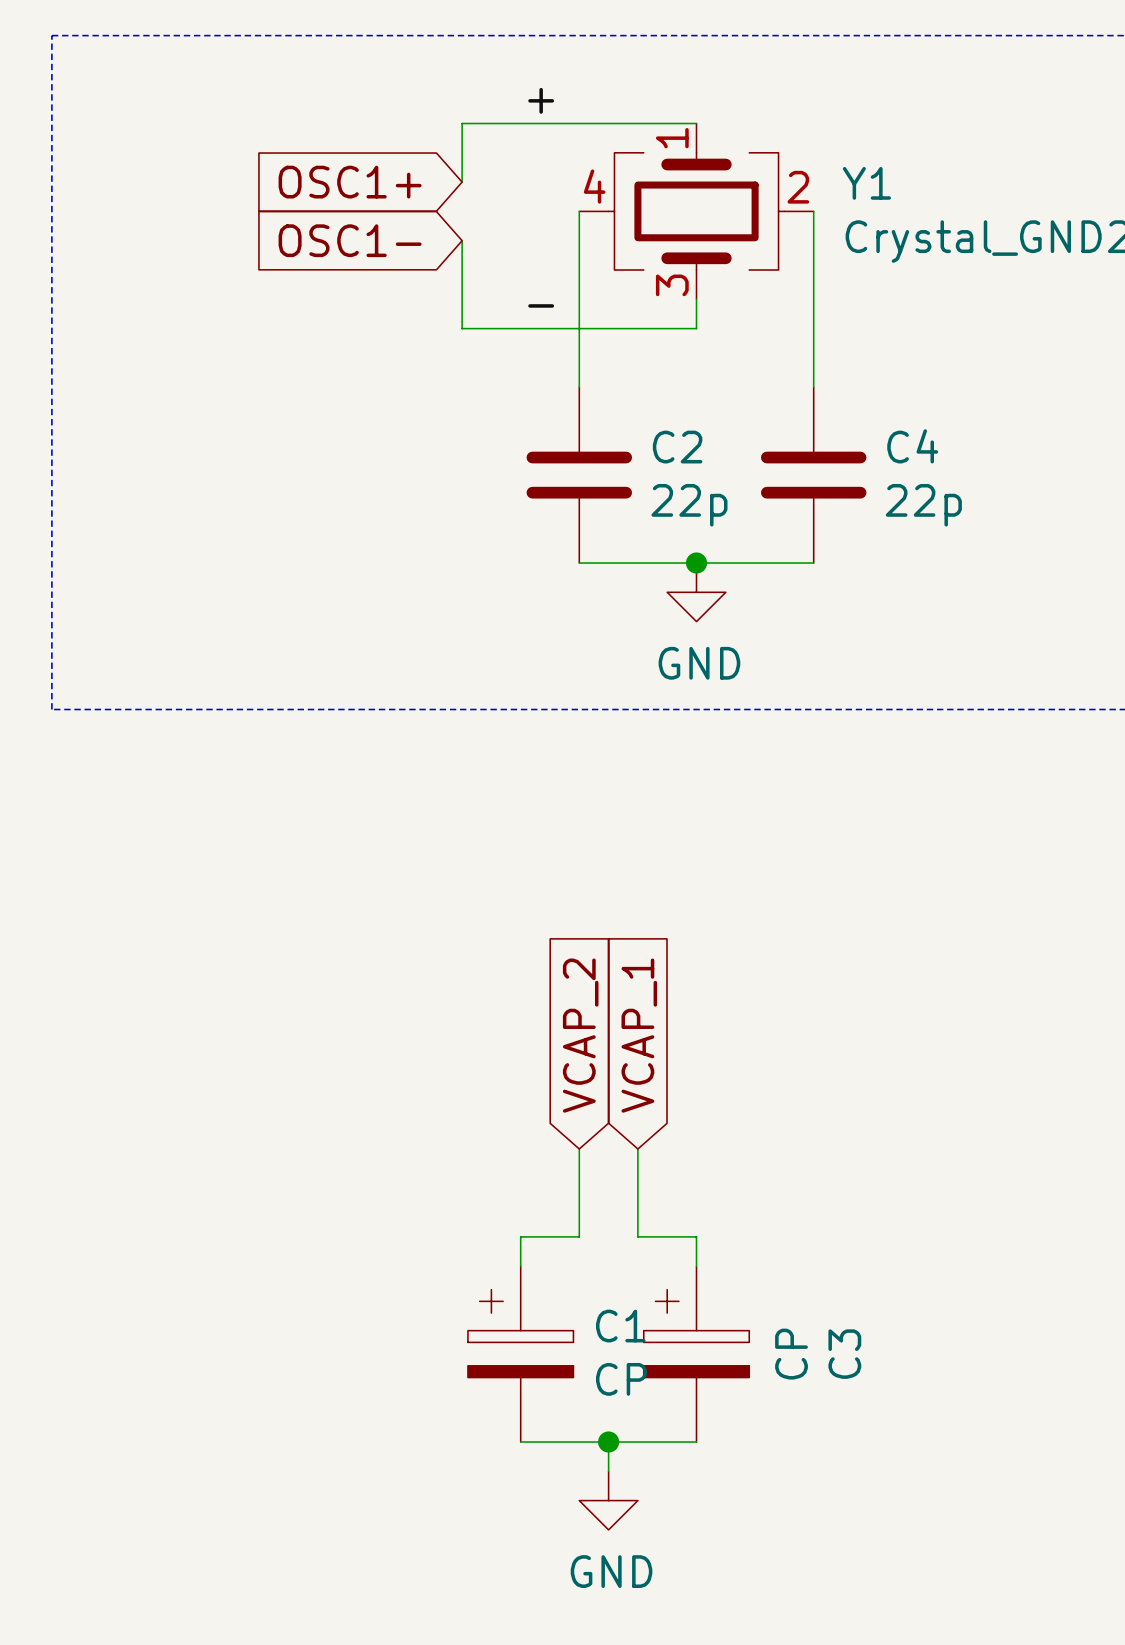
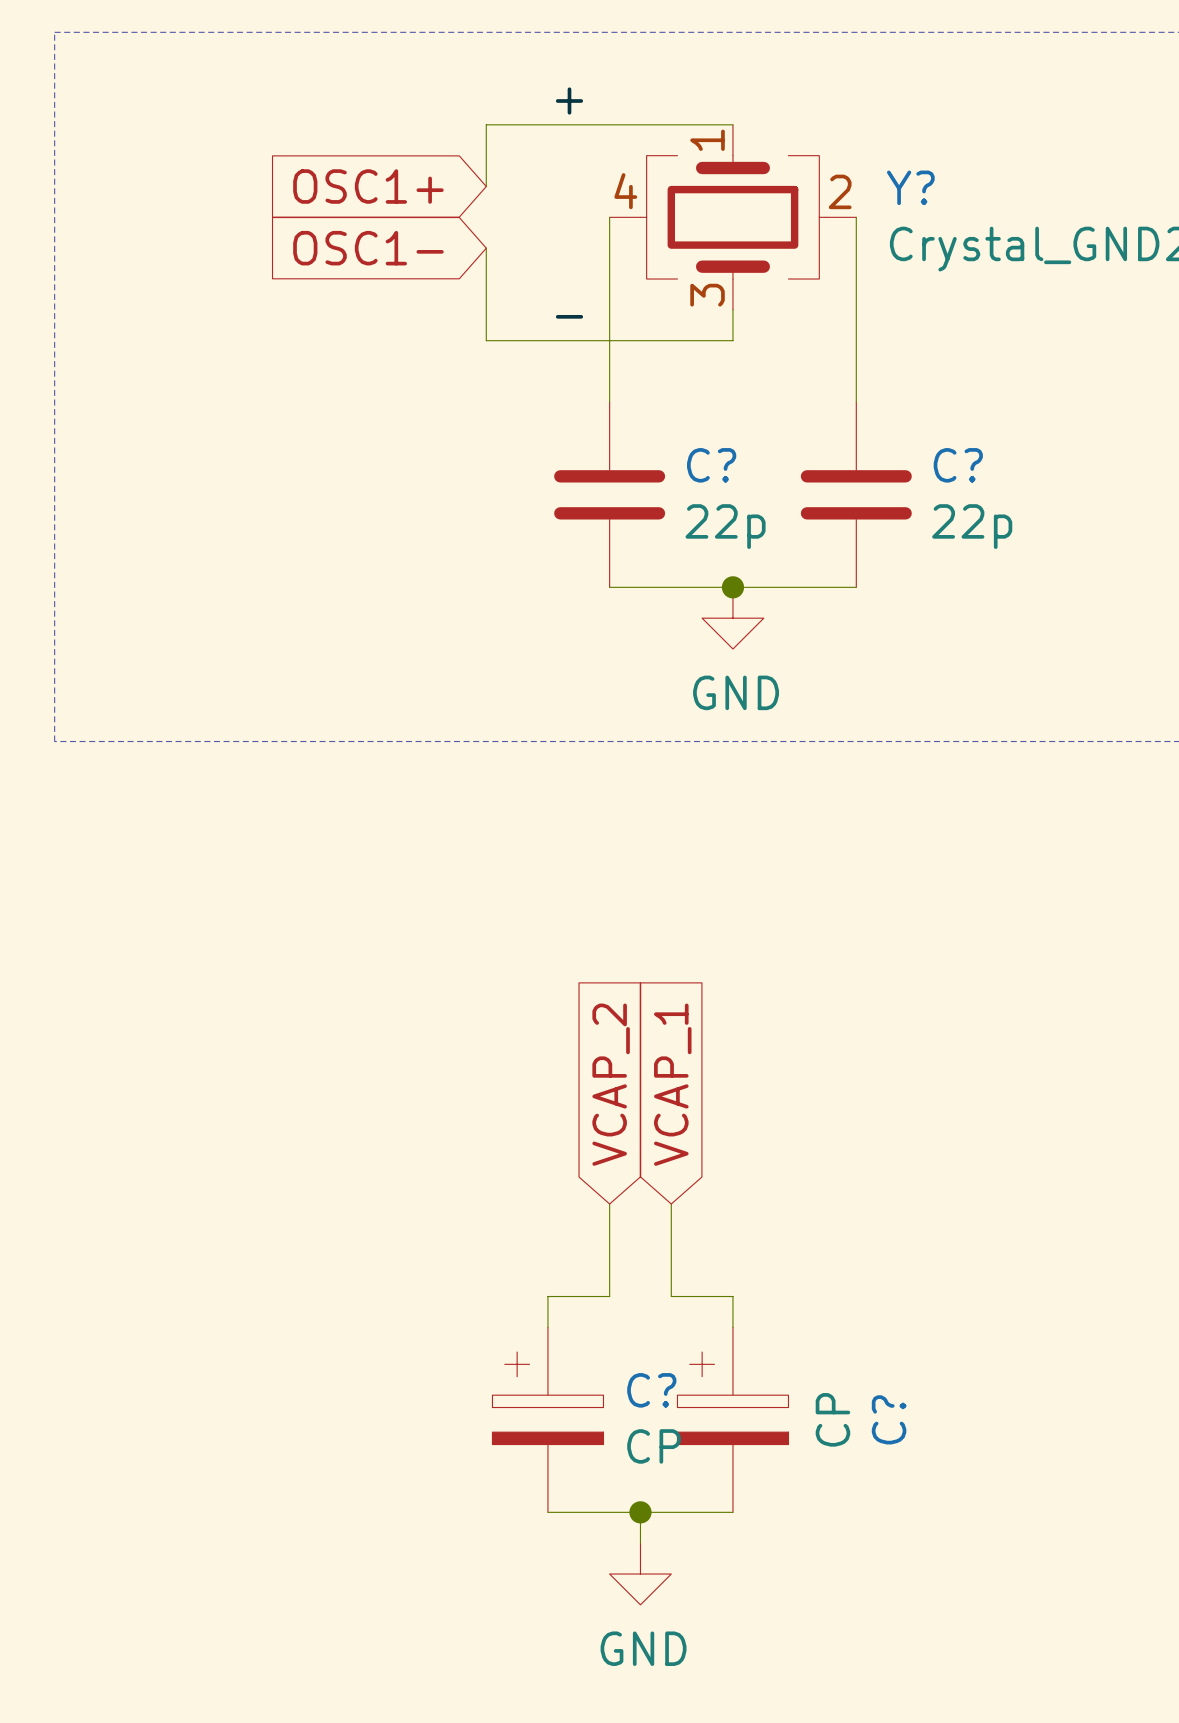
Y1 name: Y1 (866, 183) -> Y? (910, 187)
C4 name: C4 (912, 446) -> C? (958, 465)
C2 name: C2 (677, 447) -> C? (711, 465)
C1 name: C1 (620, 1326) -> C? (651, 1390)
C3 name: C3 (844, 1354) -> C? (889, 1419)

